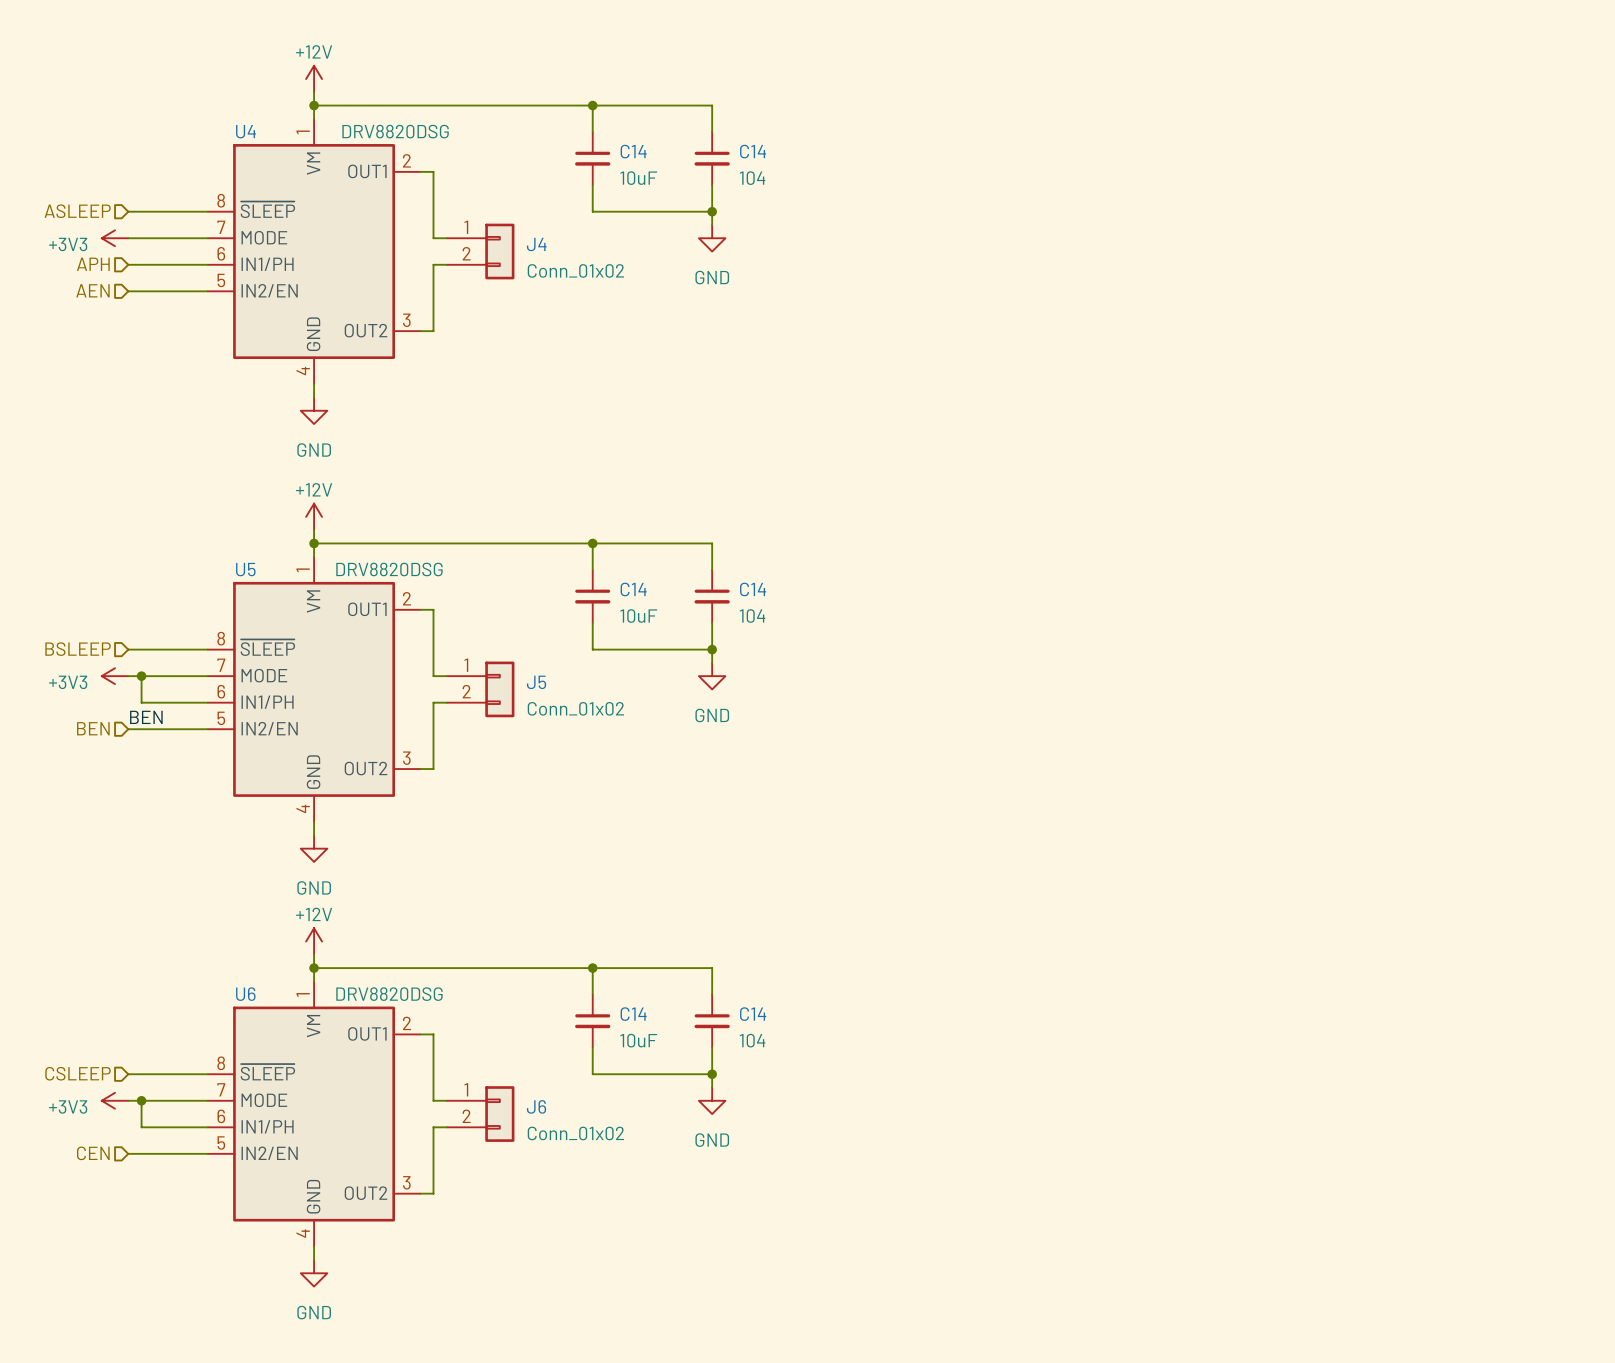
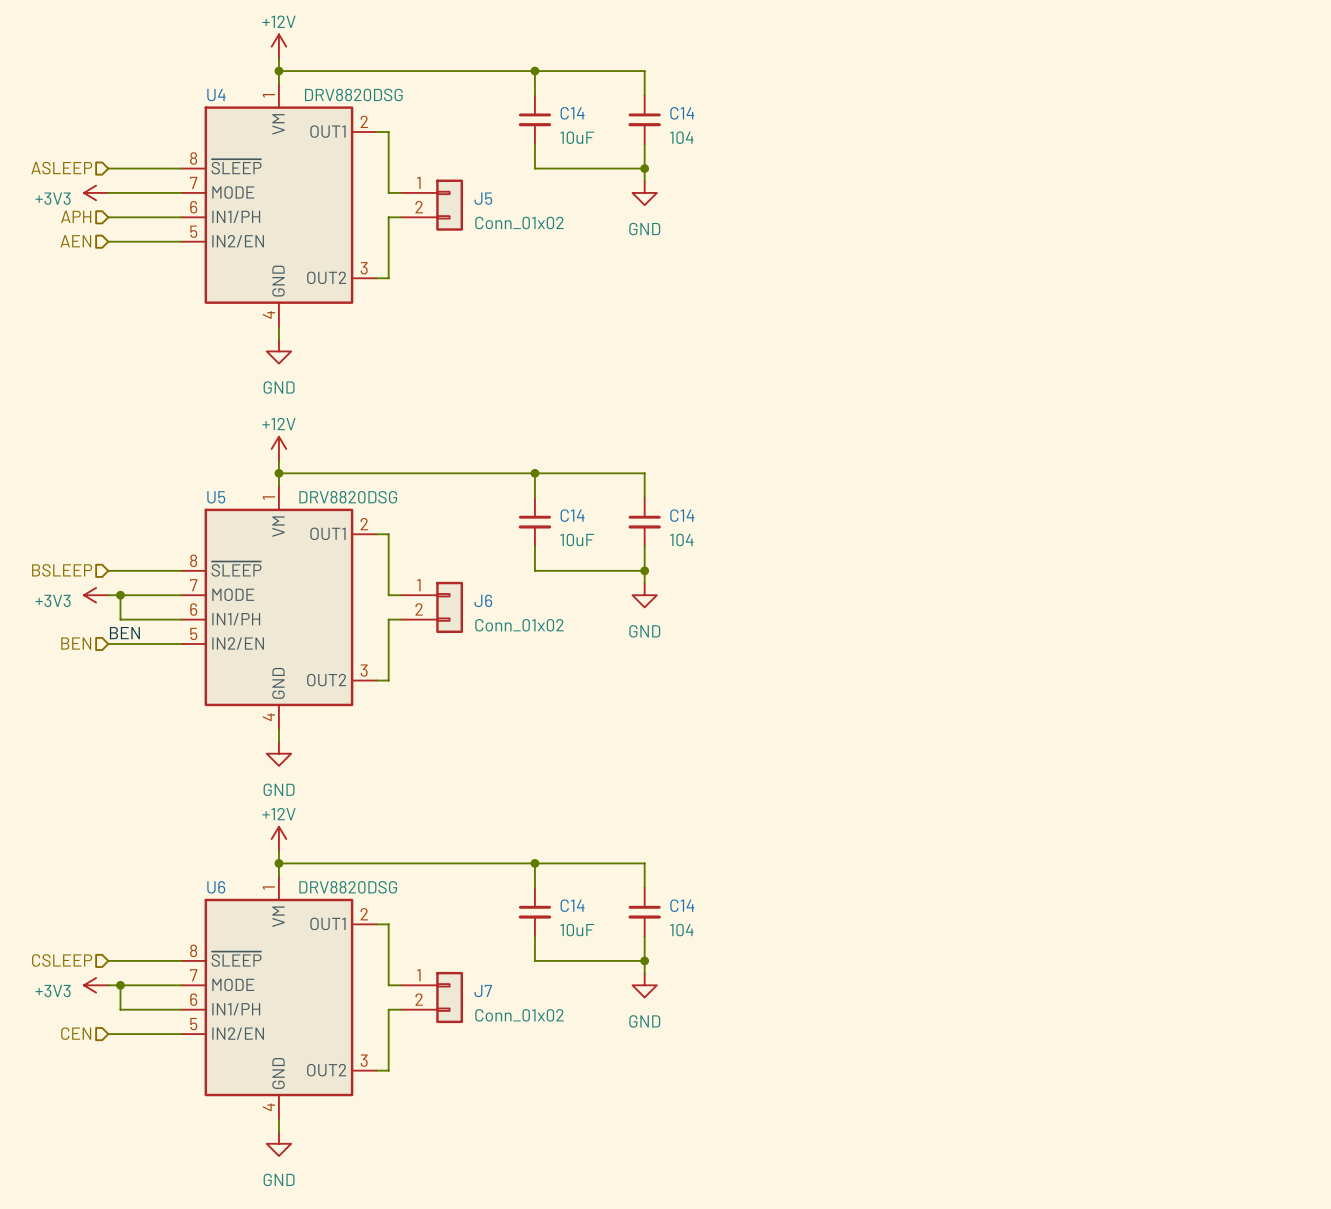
J4 name: J4 (536, 244) -> J5 (483, 198)
J5 name: J5 (536, 682) -> J6 (483, 600)
J6 name: J6 (536, 1106) -> J7 (483, 991)

